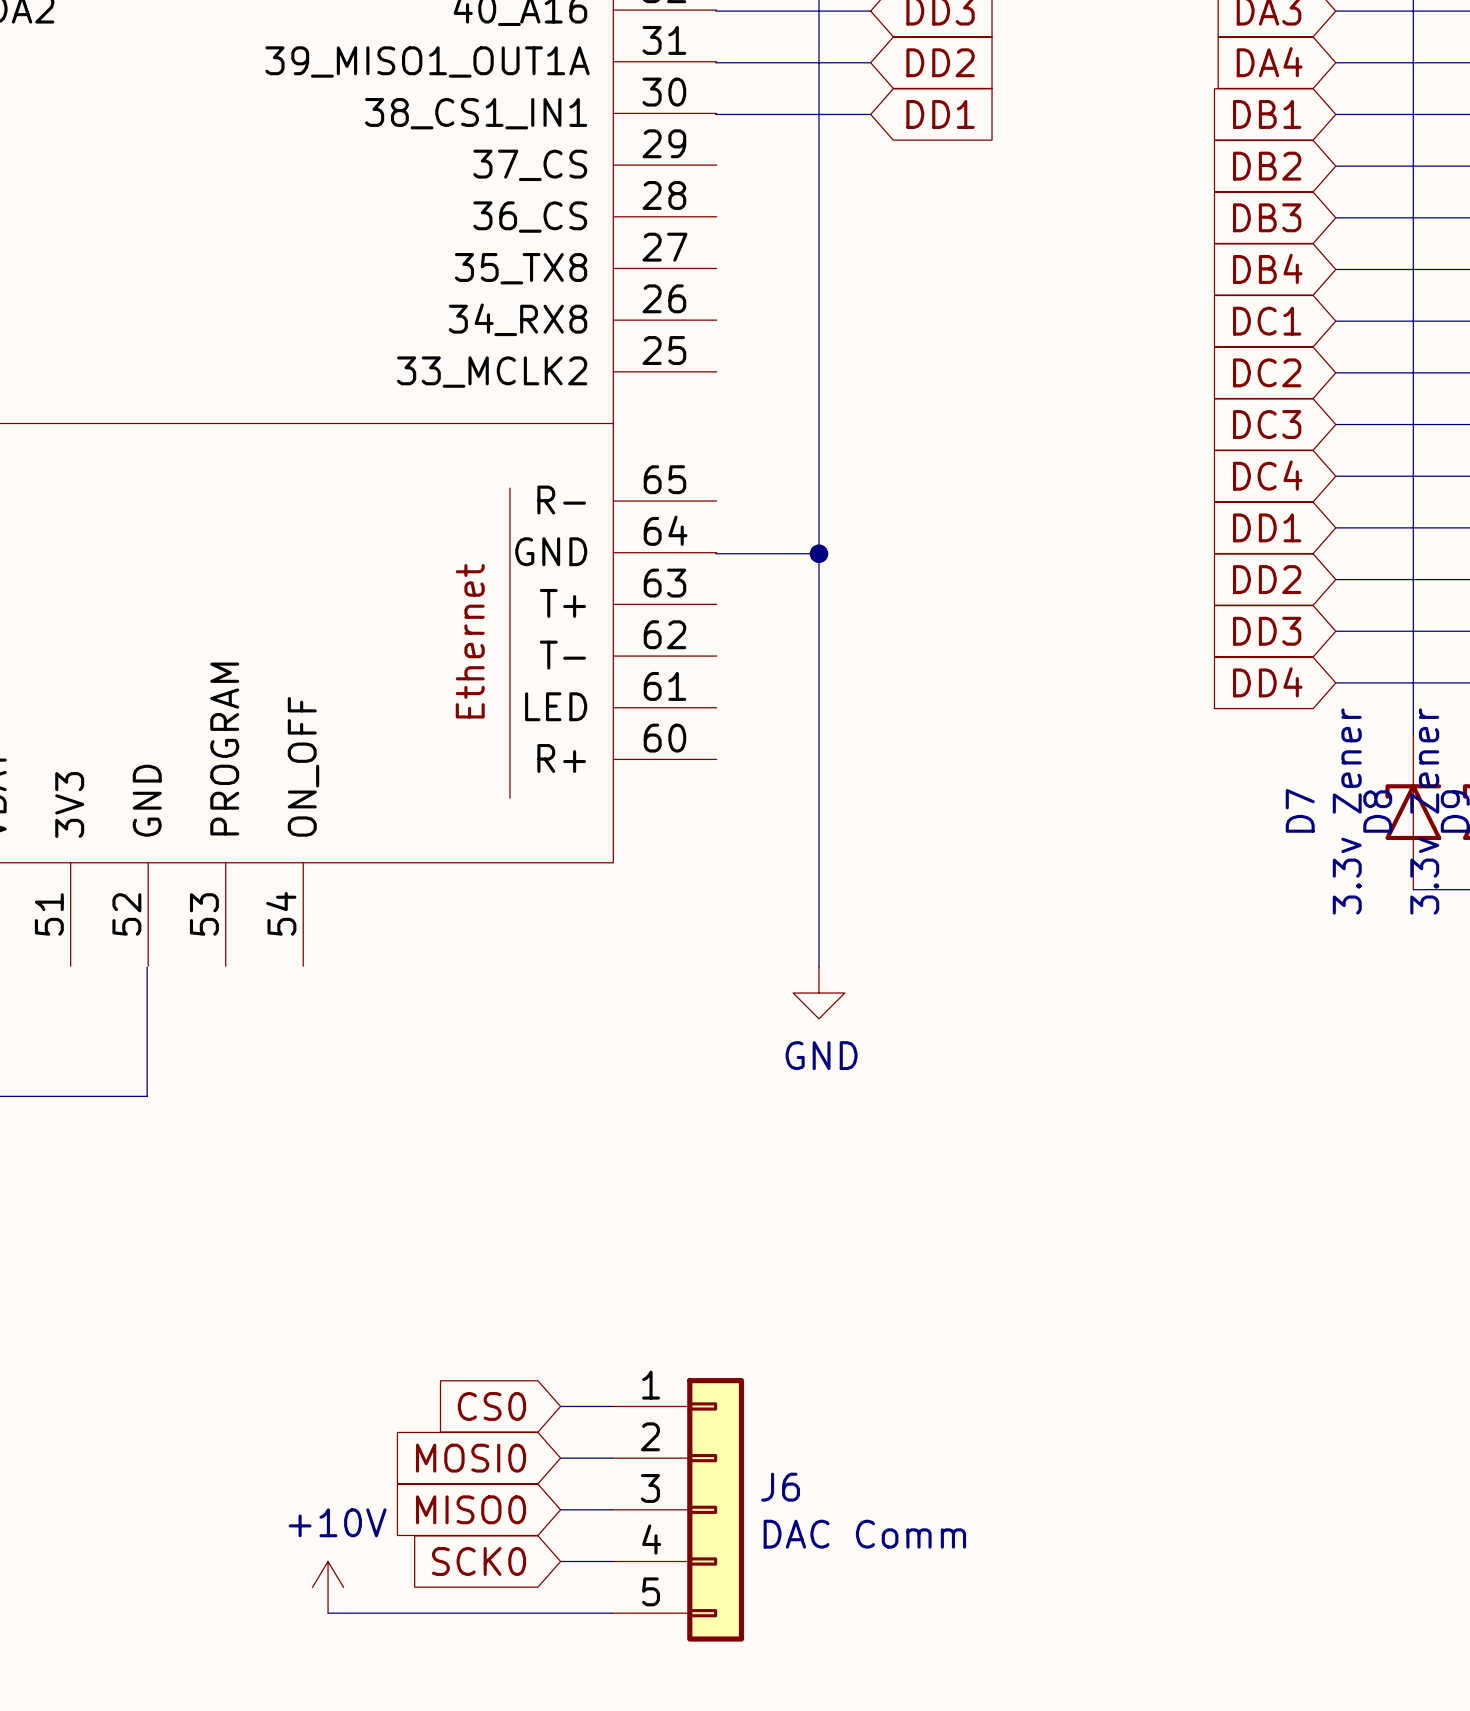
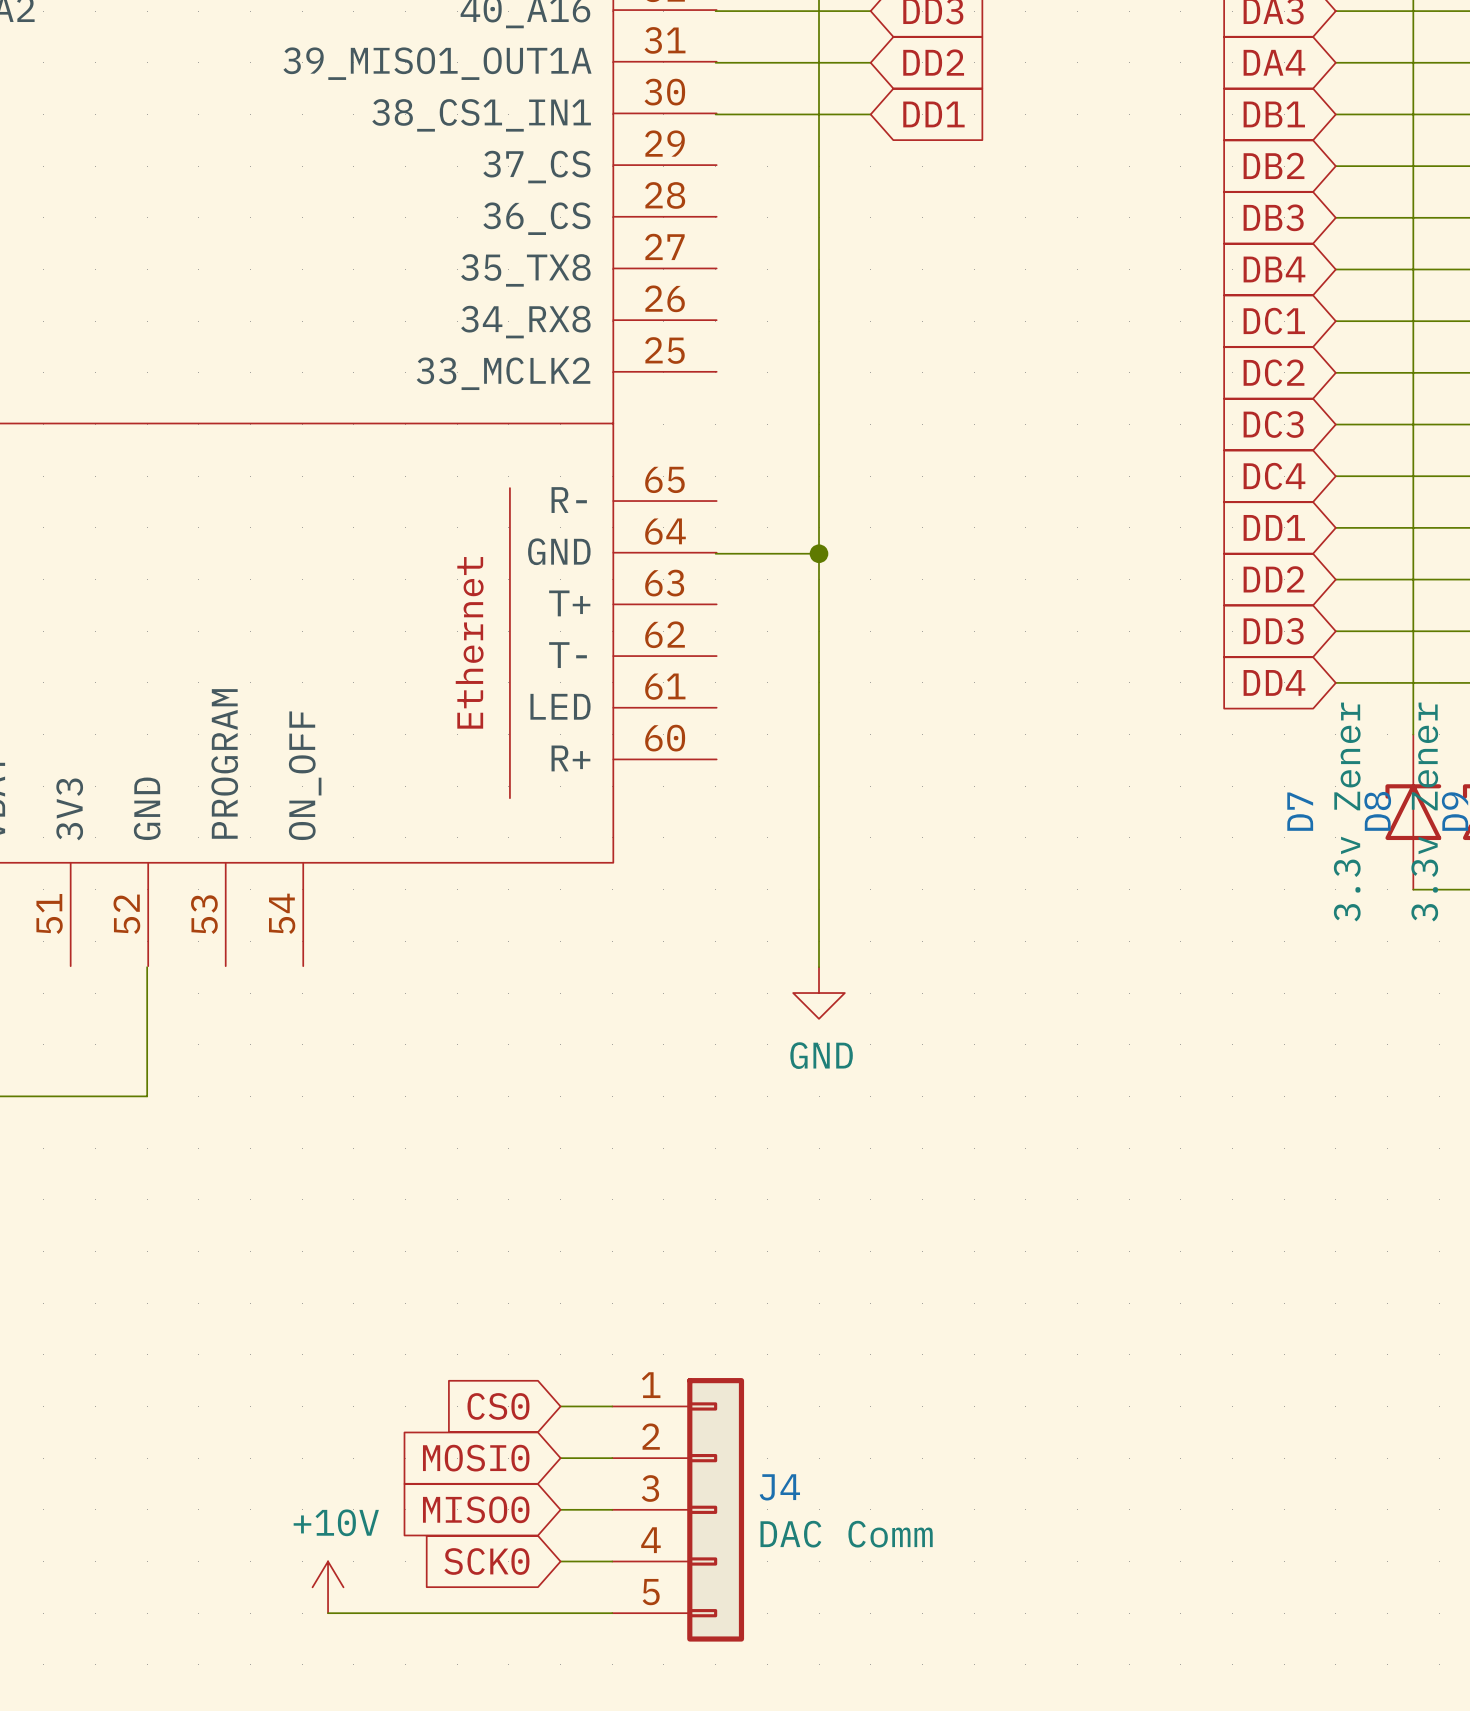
J6 name: J6 (780, 1487) -> J4 (779, 1487)

